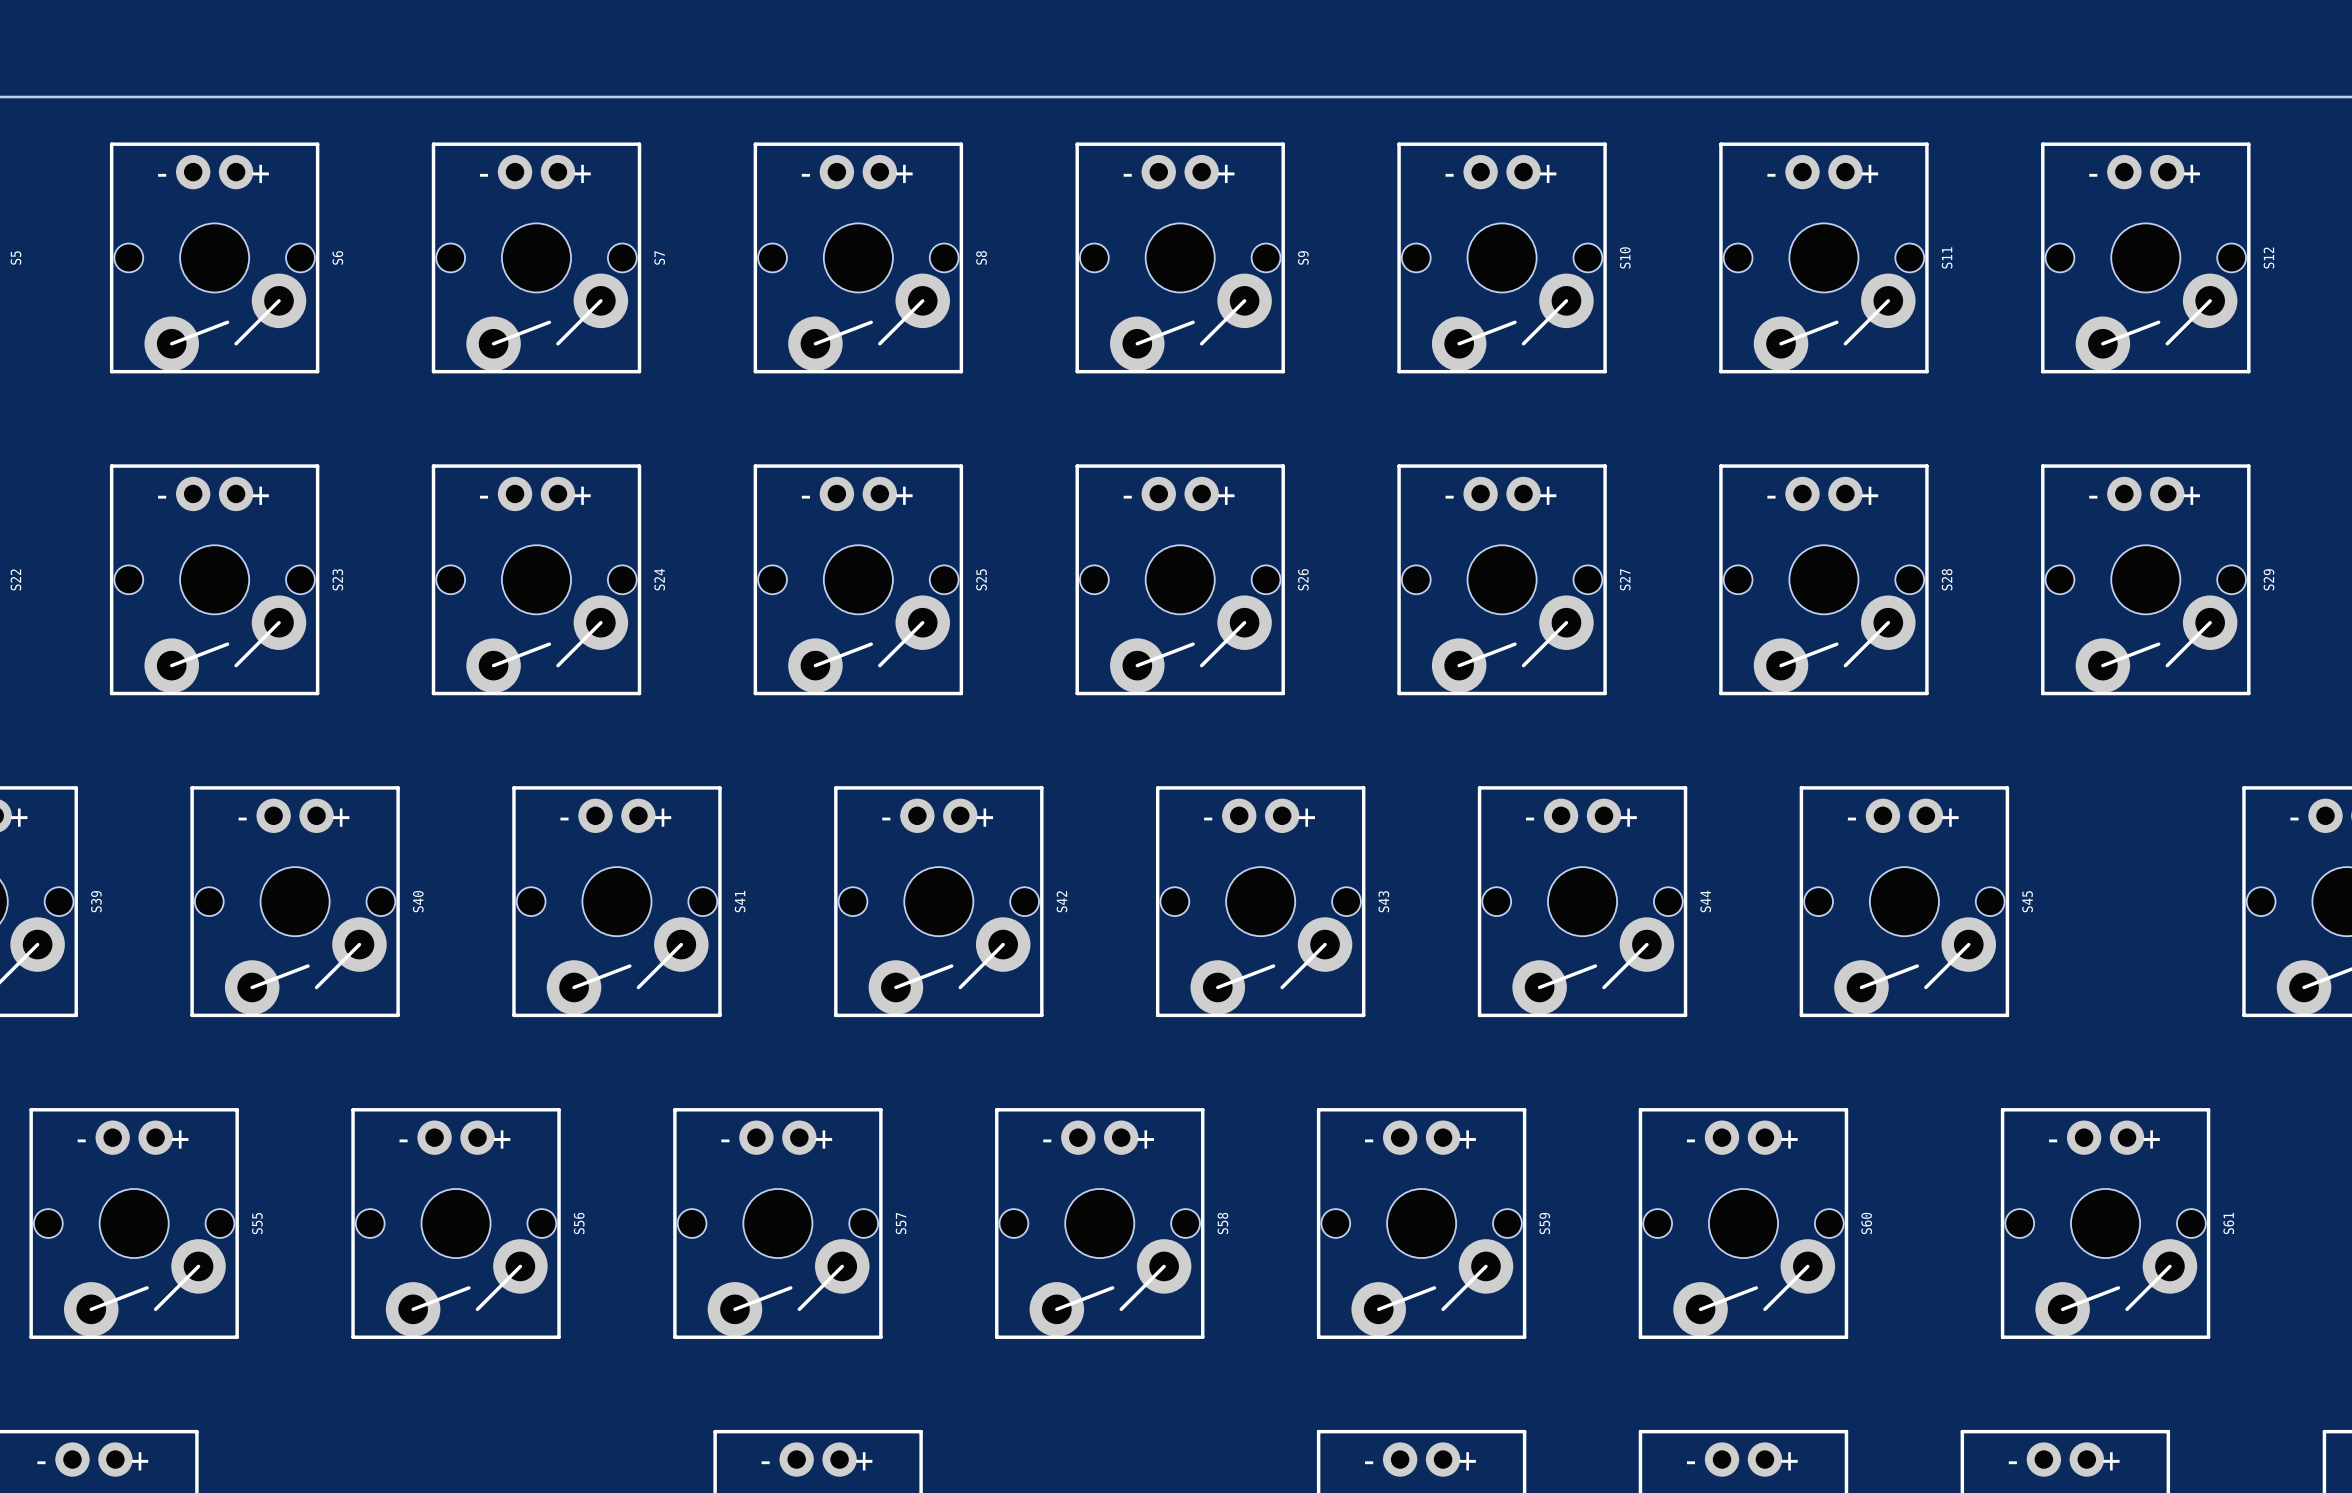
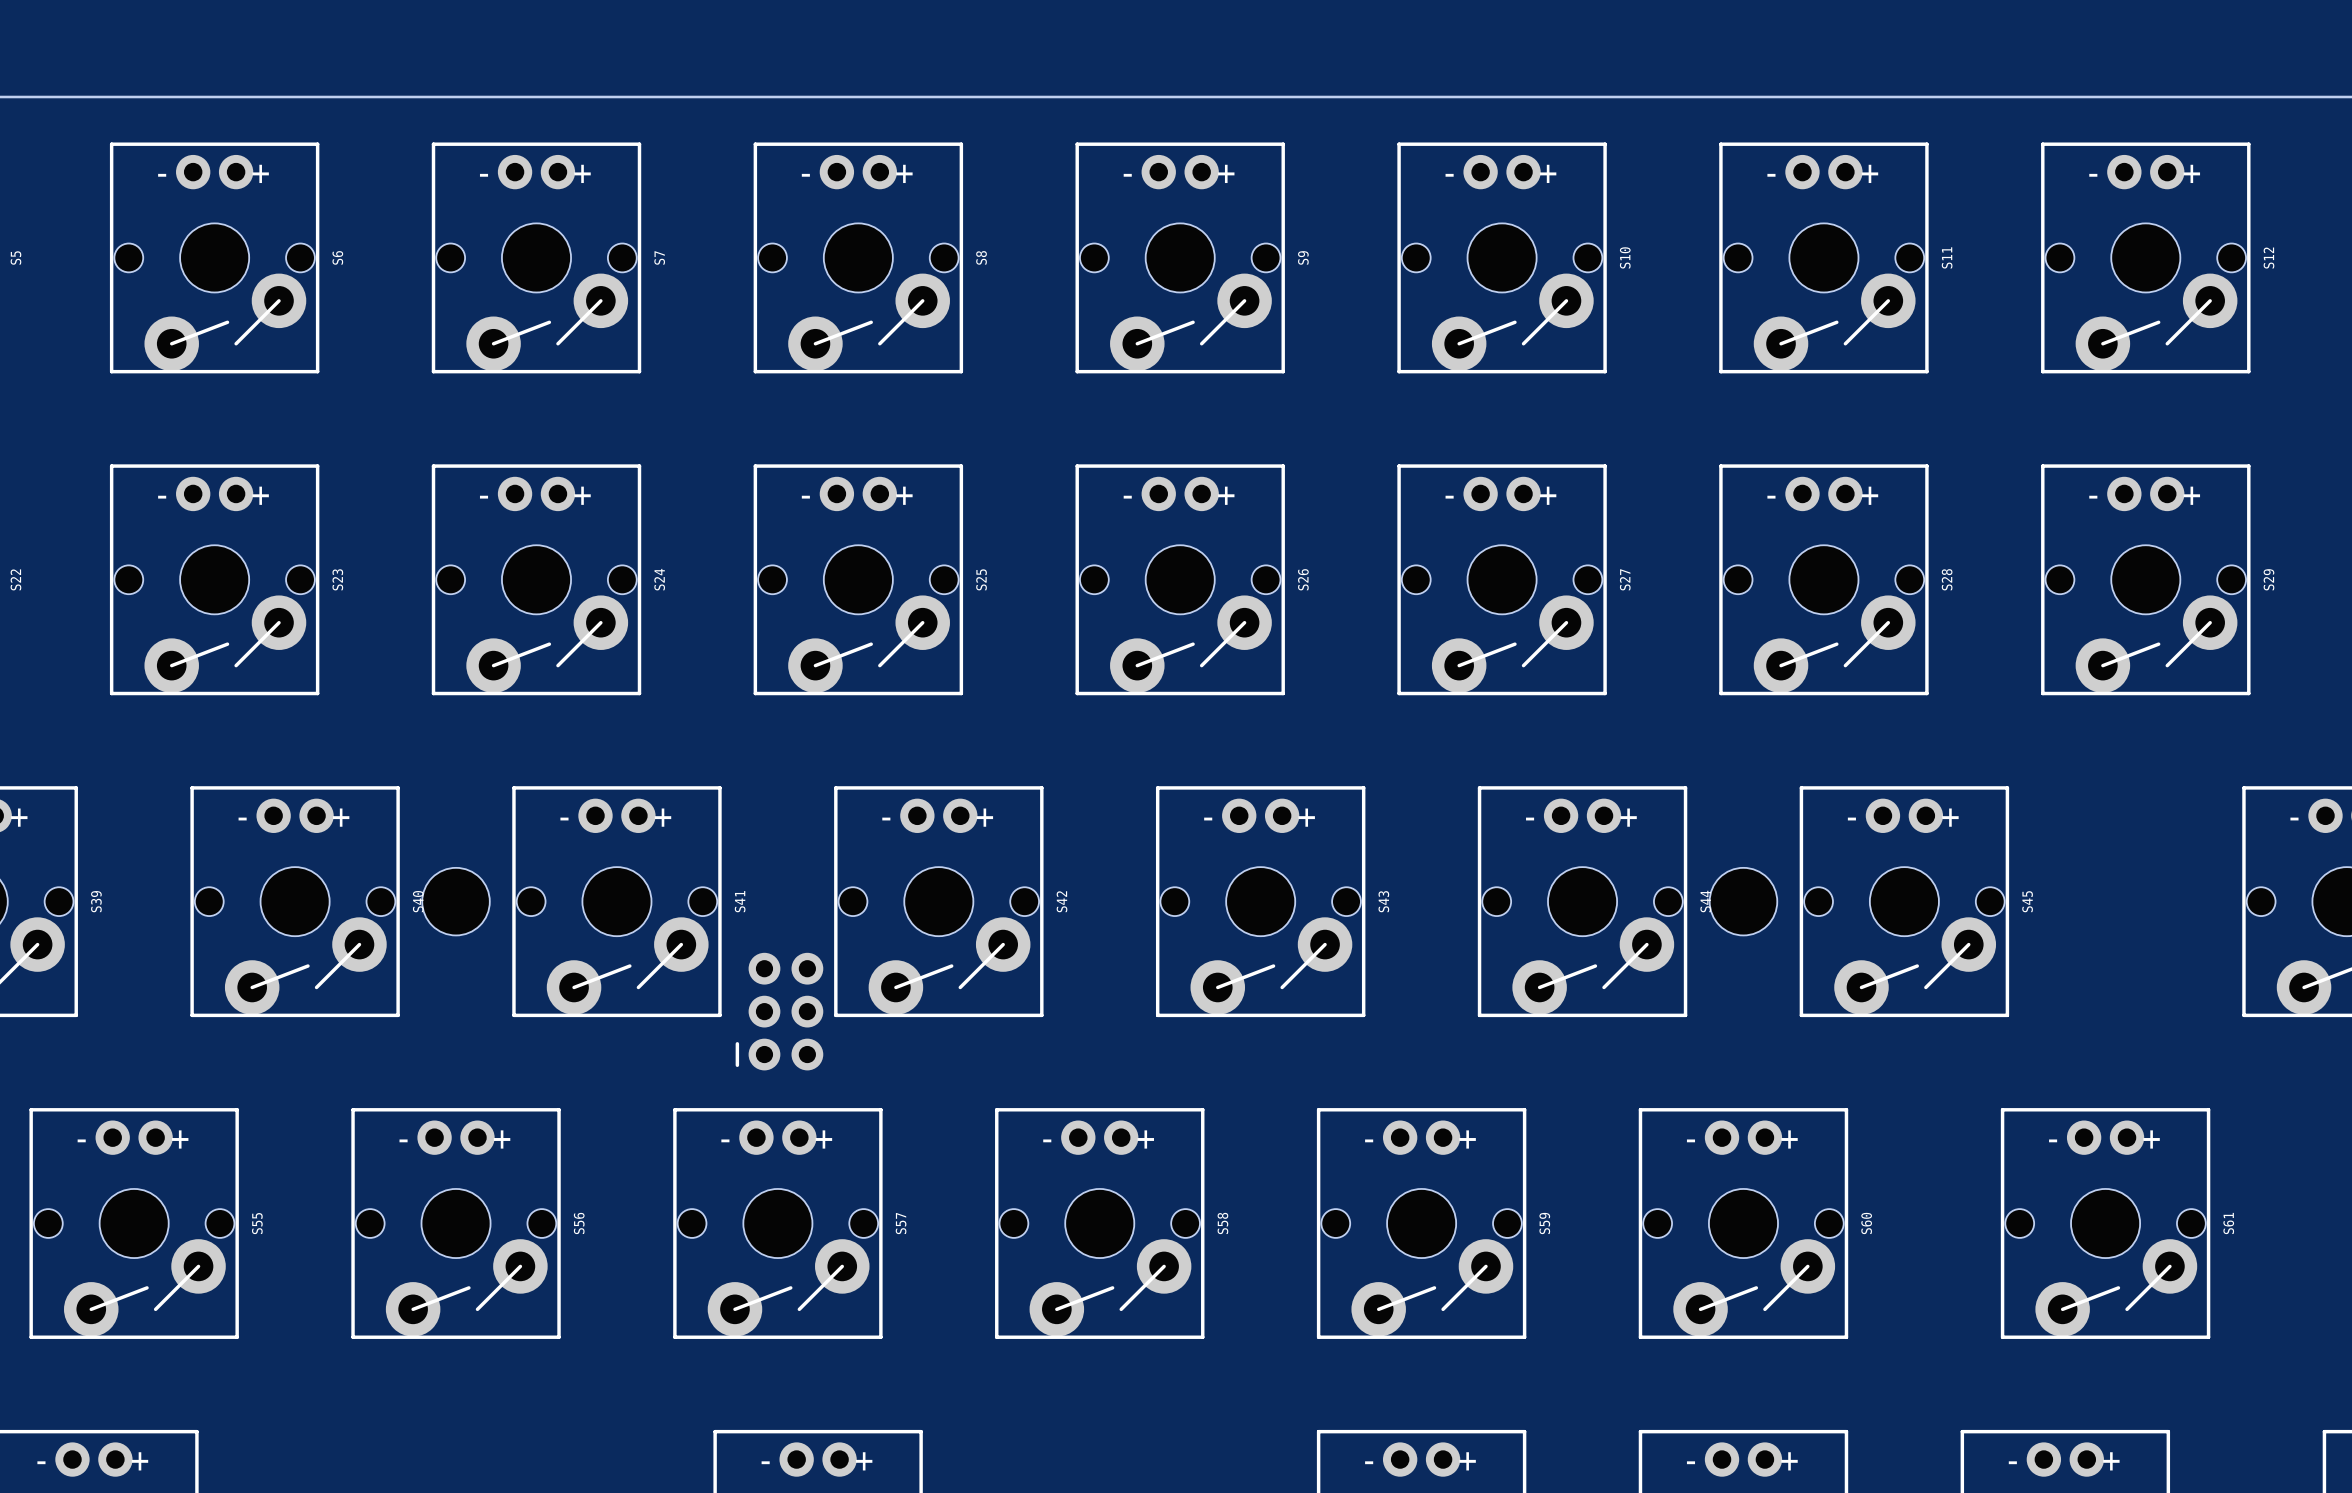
hole: none -> (456, 901)
hole: none -> (1743, 901)
part: none -> (779, 1011)

